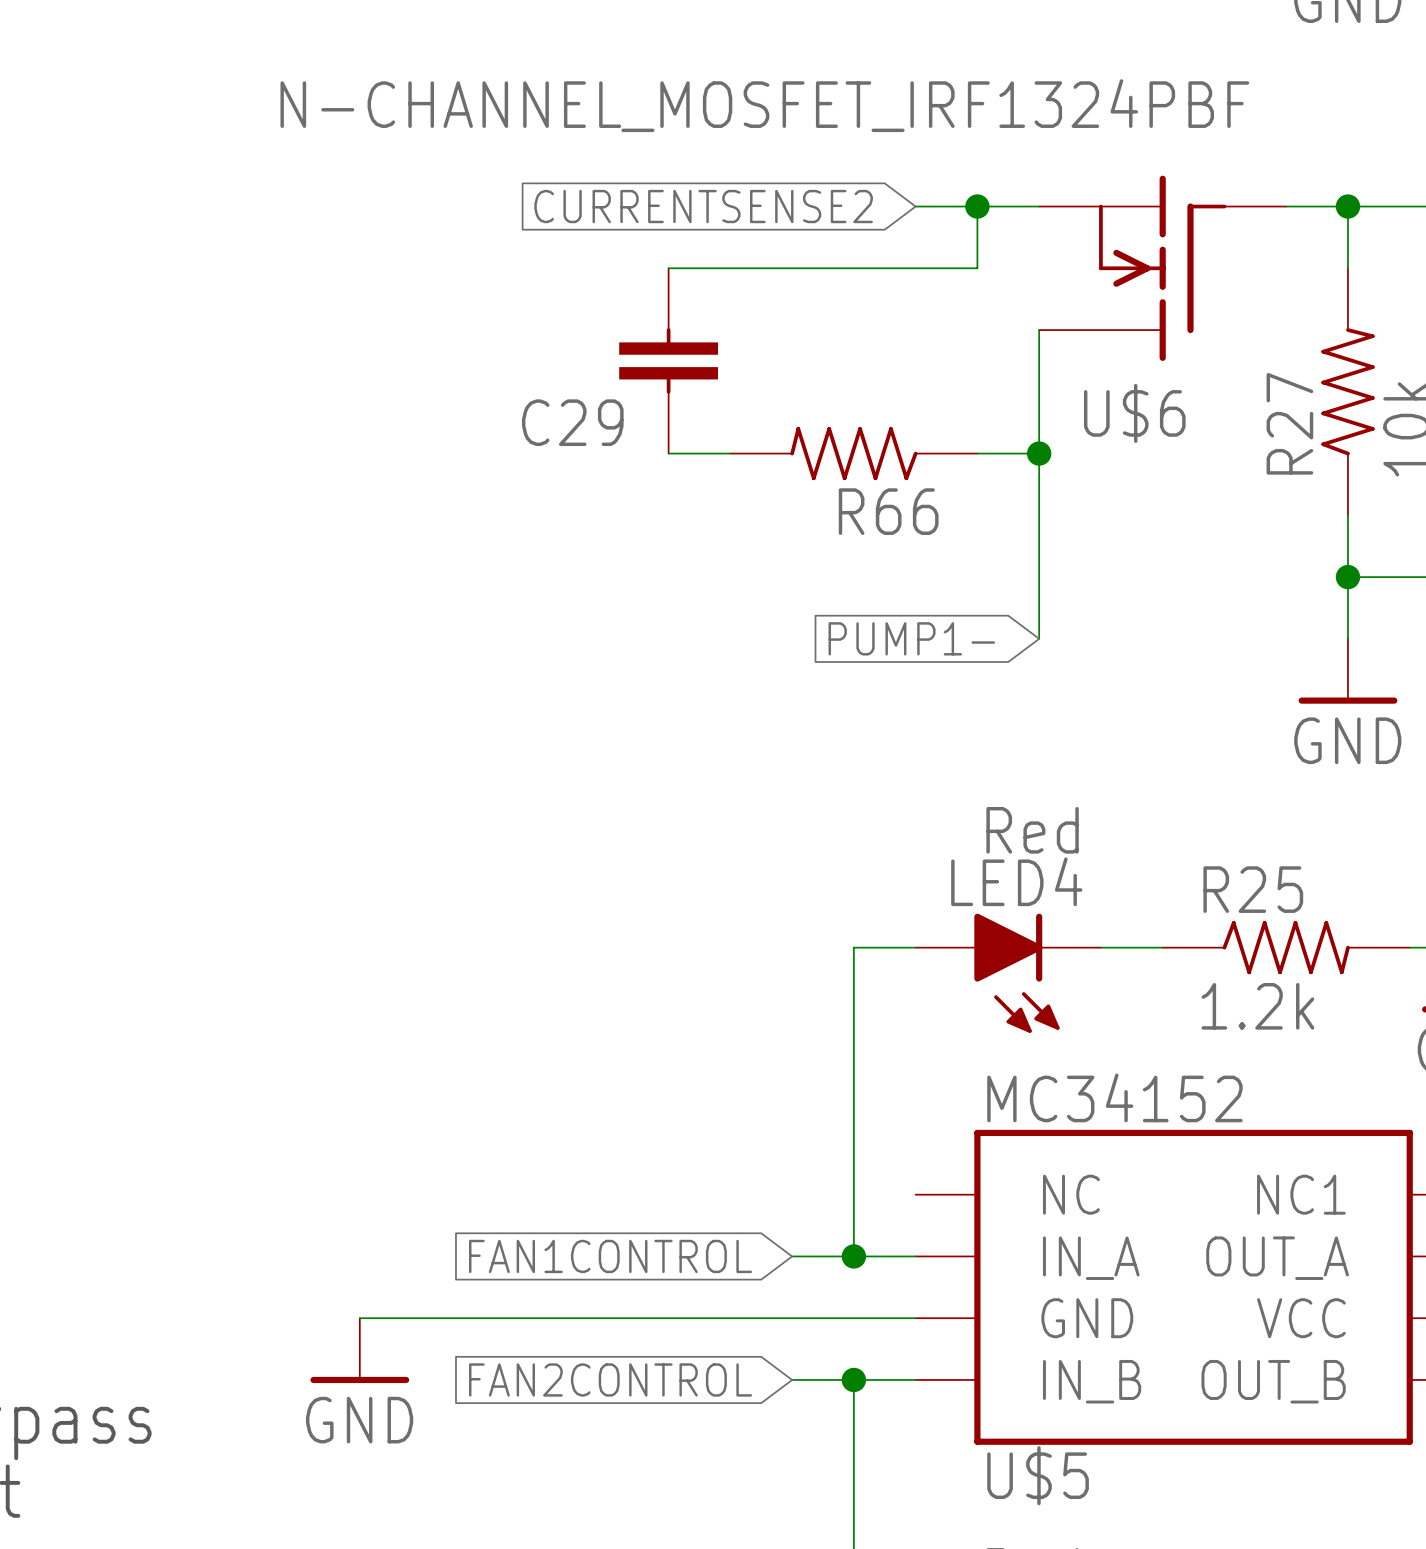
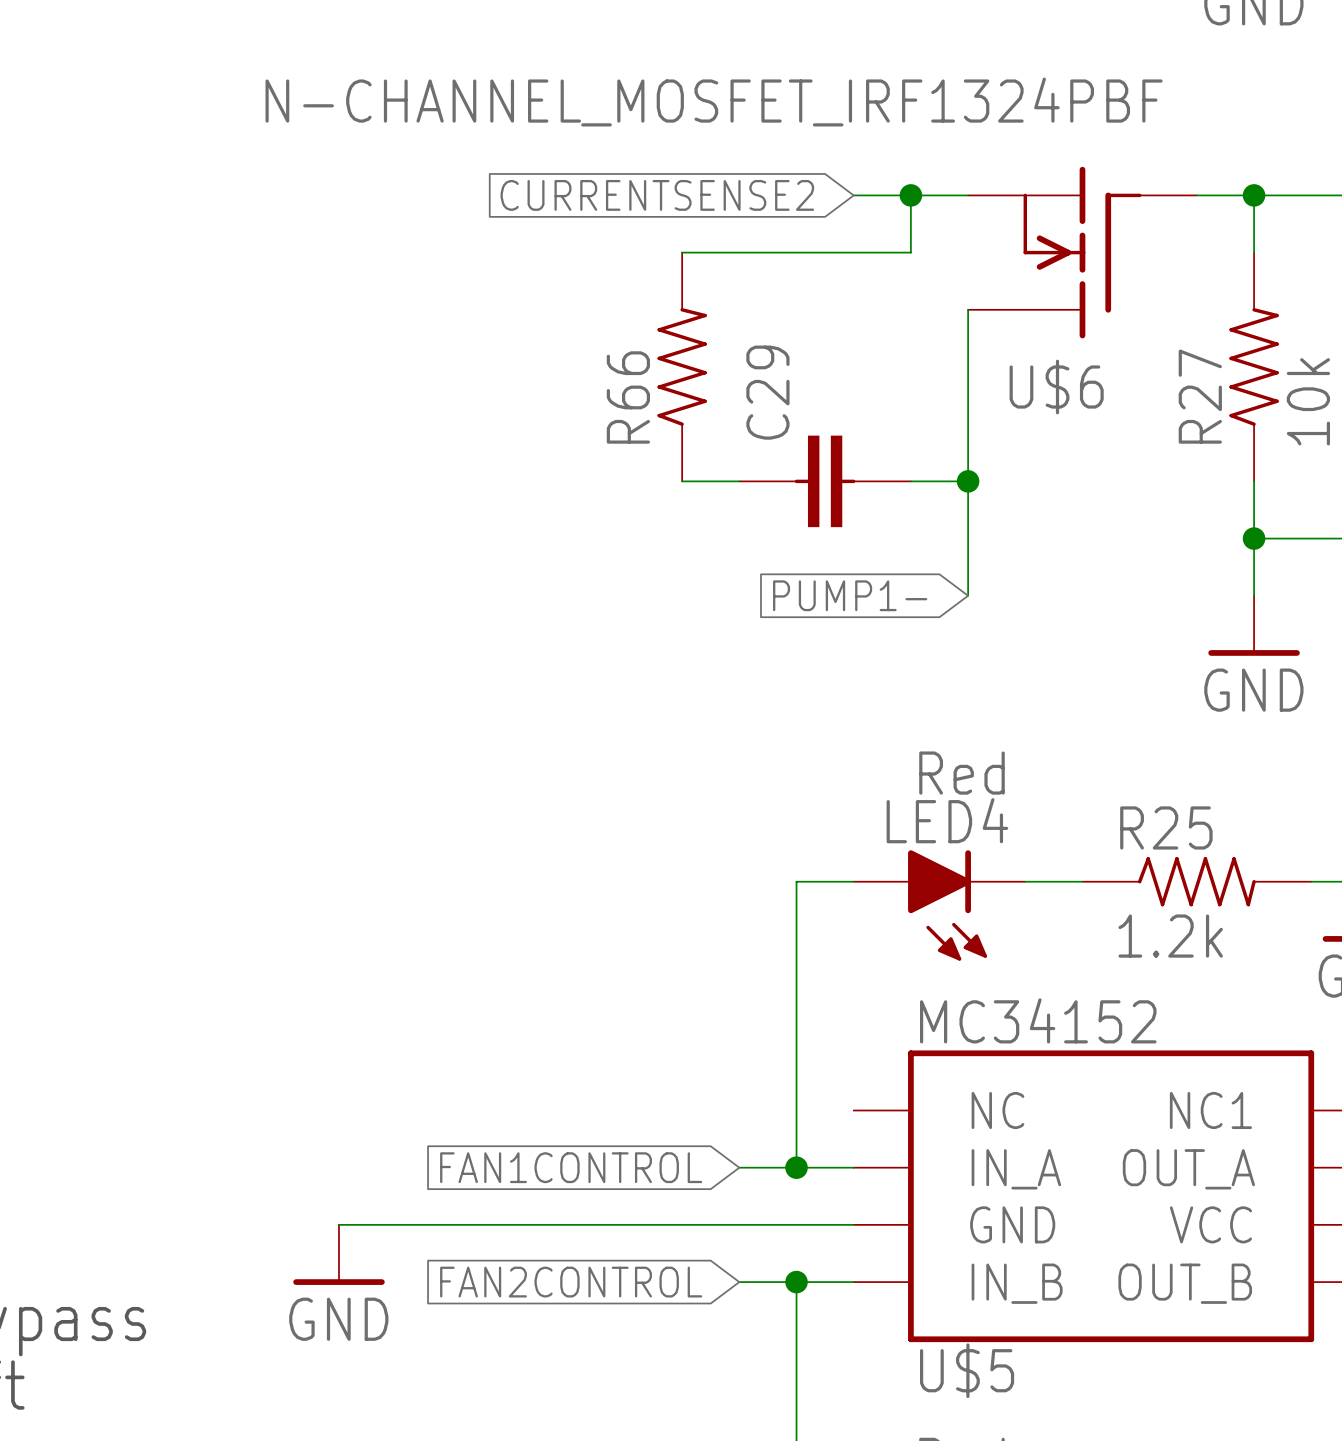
wire: (668, 268) (730, 268) -> none
C29 rotation: 0° (668, 360) -> 90° clockwise (825, 481)
C29 position: (668, 360) -> (825, 481)
wire: (668, 453) (730, 453) -> (682, 481) (739, 481)
R66 rotation: 0° (853, 453) -> 90° clockwise (682, 366)
wire: (977, 453) (1039, 453) -> (910, 481) (968, 481)
junction position: (1039, 453) -> (968, 481)

